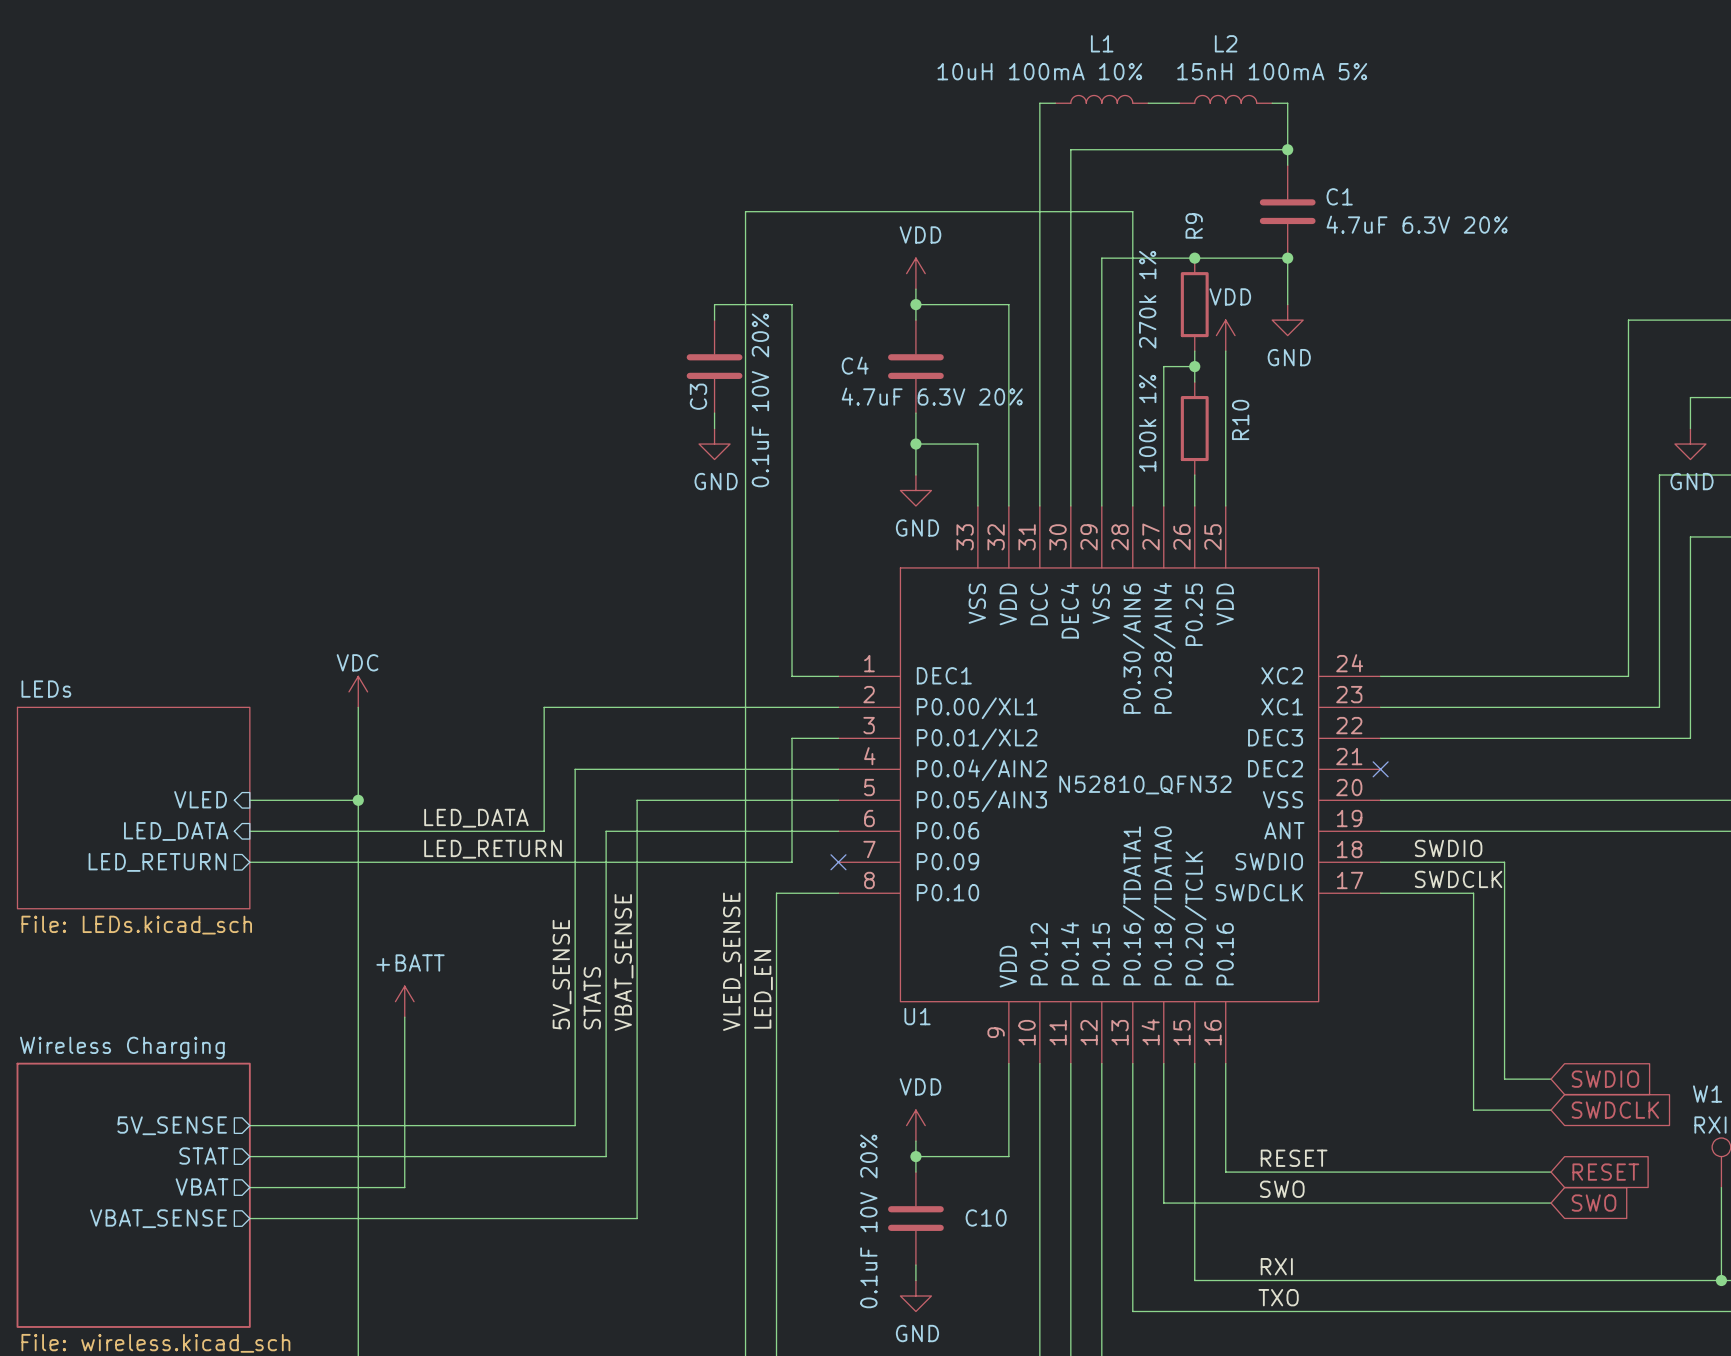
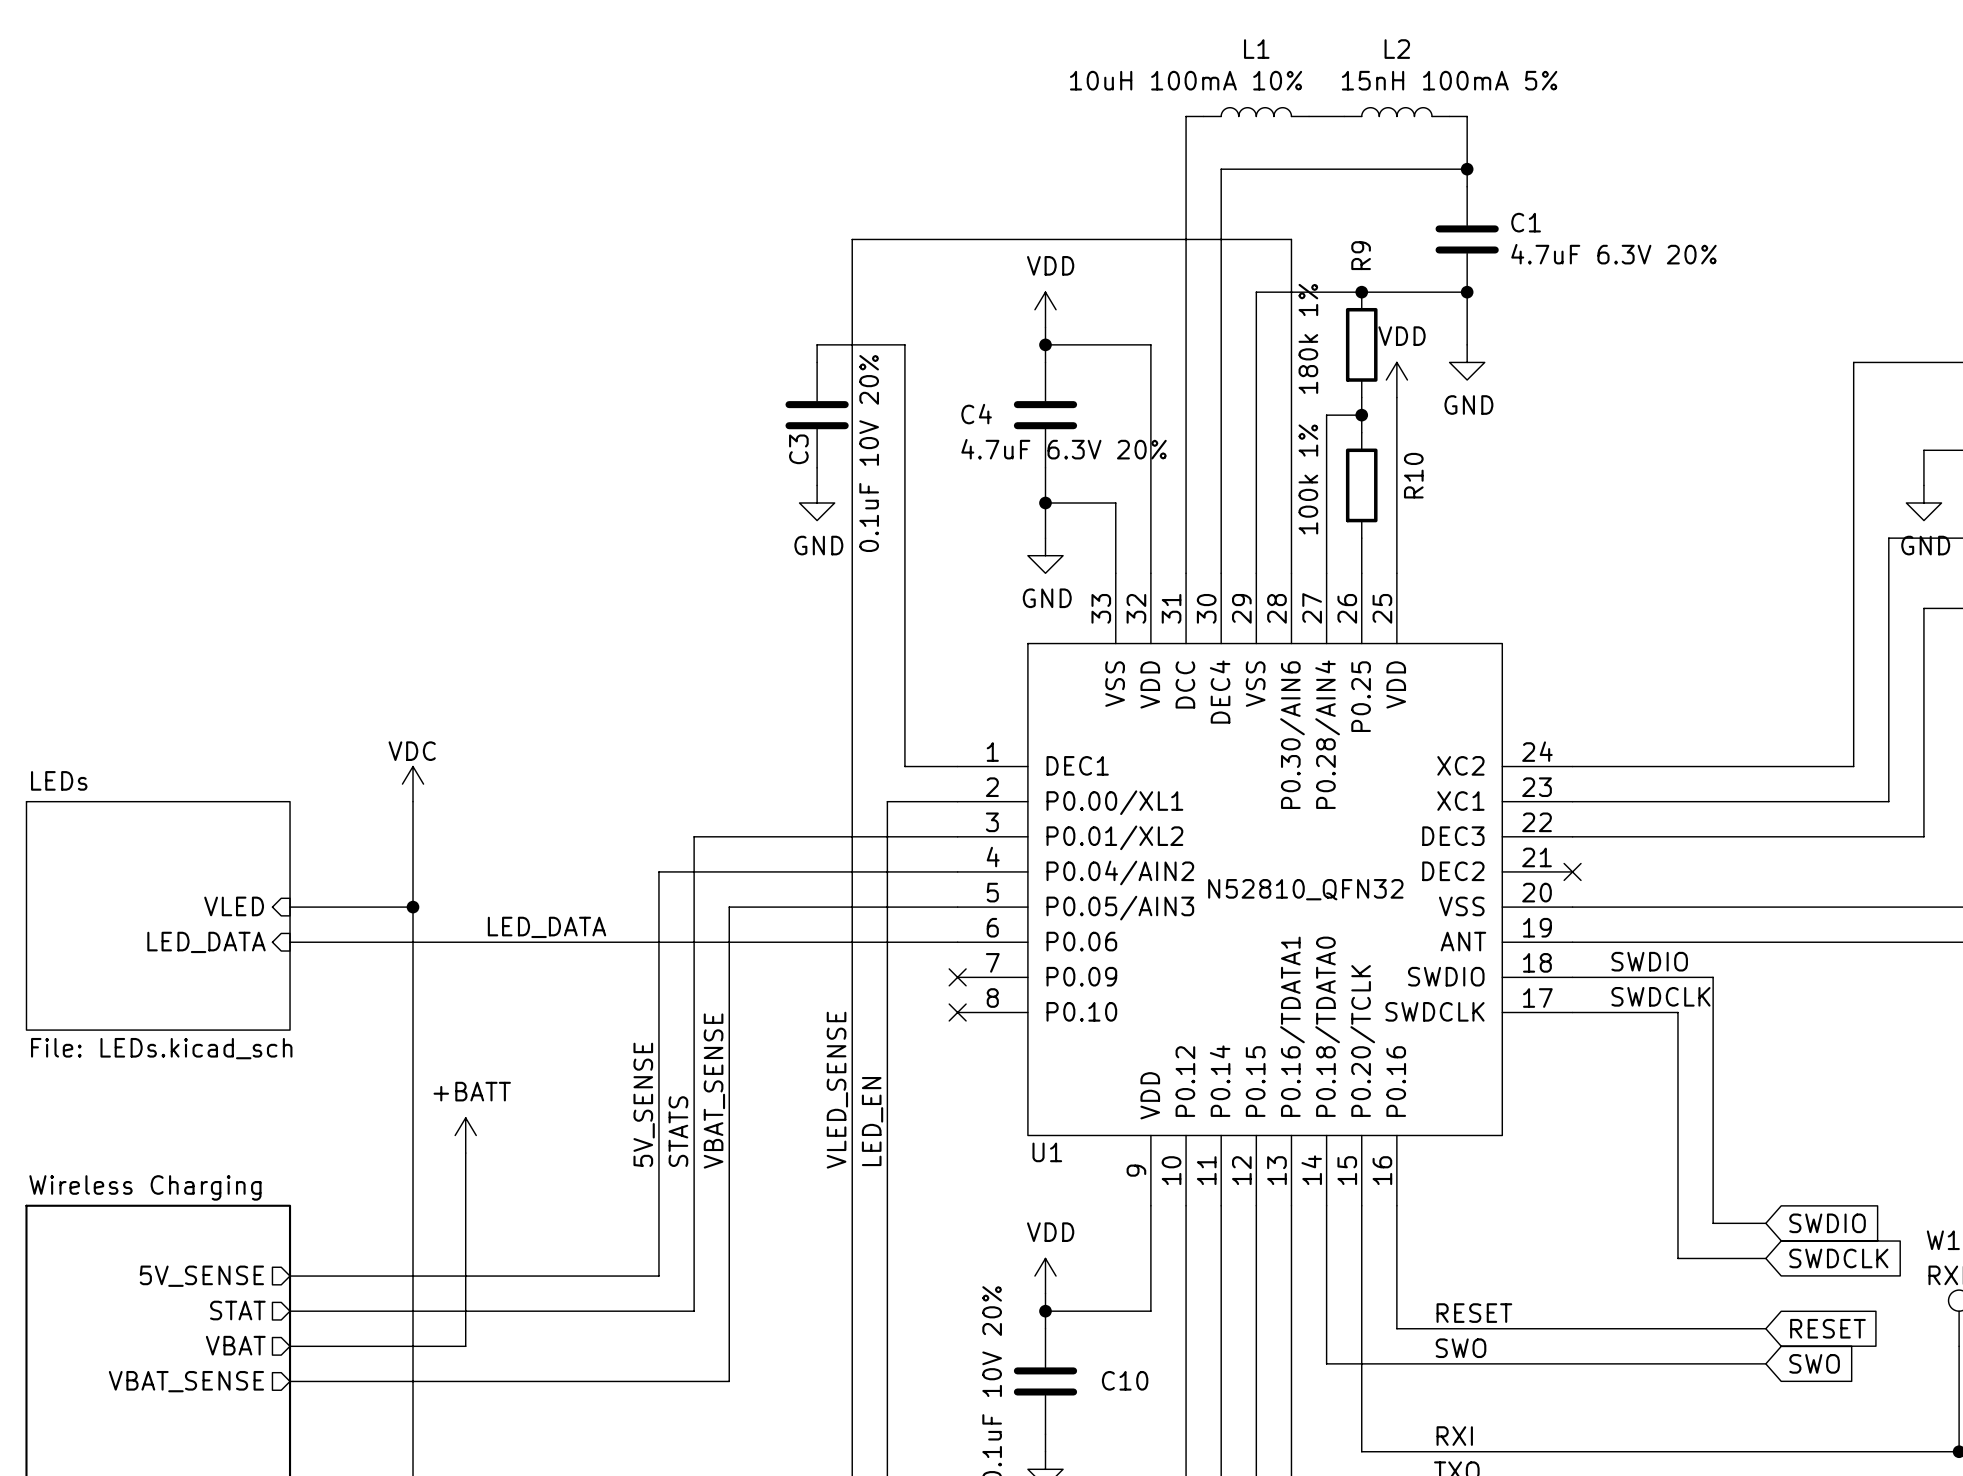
R9 value: 270k 1% (1147, 299) -> 180k 1% (1308, 338)
wire: (776, 707) (544, 707) (544, 831) -> (904, 836) (694, 836) (694, 942) (623, 942)
wire: (792, 738) (792, 862) (249, 862) -> none
label: LED_RETURN (493, 849) -> none
sheet pin: LED_RETURN (157, 862) -> none
wire: (776, 893) (838, 893) -> (887, 1012) (887, 801)
no-connect mark: none -> (957, 1012)

